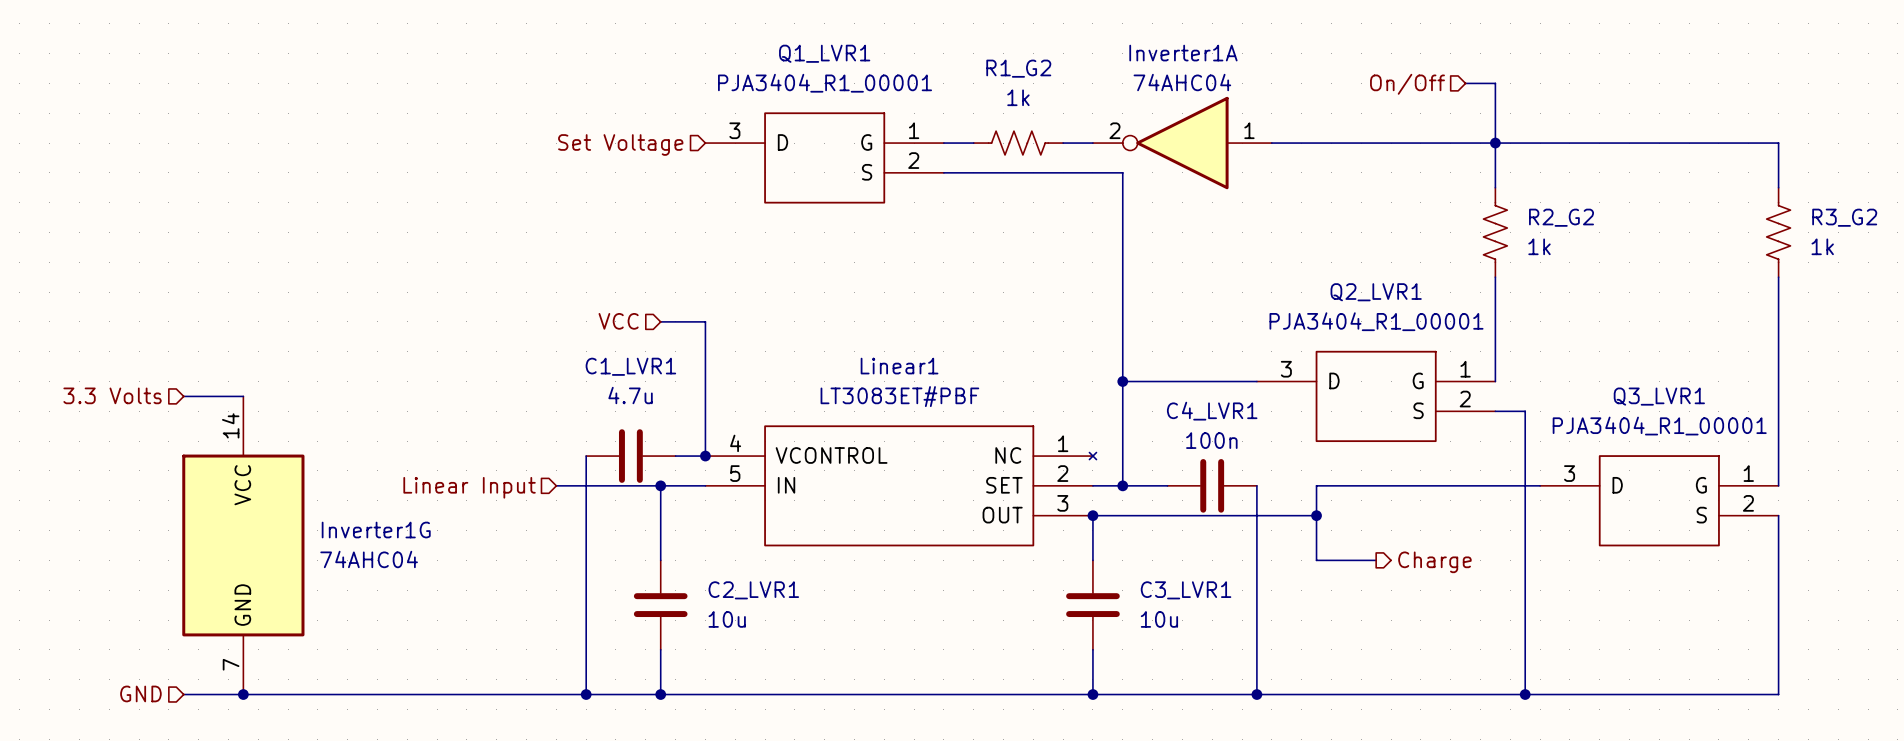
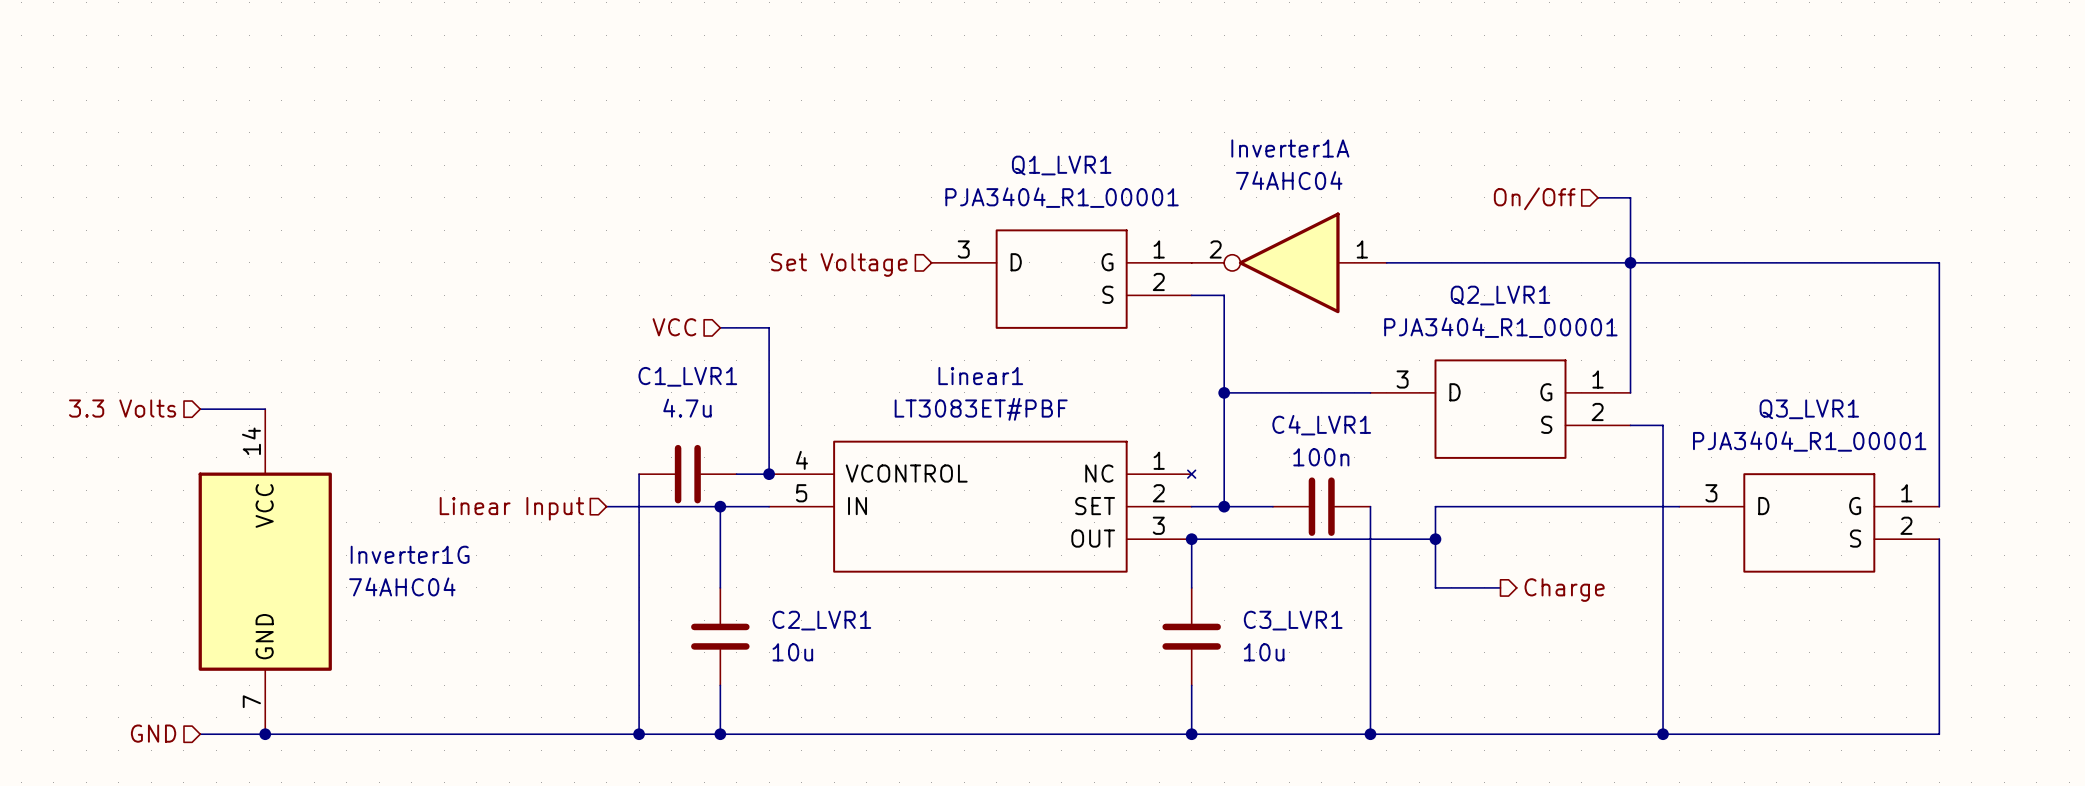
Inverter1A name position: Inverter1A (1183, 53) -> Inverter1A (1290, 148)
Inverter1A value position: 74AHC04 (1182, 82) -> 74AHC04 (1289, 180)
wire: (1465, 83) (1495, 83) (1495, 187) -> none
hierarchical label position: On/Off (1407, 84) -> On/Off (1534, 198)
wire: (943, 143) (973, 143) -> none
R1_G2: 1k (1018, 143) -> none
wire: (1063, 143) (1092, 143) -> none
Inverter1A position: (1182, 143) -> (1289, 262)
wire: (1271, 143) (1778, 143) (1778, 187) -> none
junction: (1495, 143) -> none
hierarchical label position: Set Voltage (620, 144) -> Set Voltage (839, 264)
Q1_LVR1 position: (824, 157) -> (1061, 279)
wire: (943, 172) (1122, 172) (1122, 292) -> (1191, 295) (1224, 295)
wire: none -> (1598, 197) (1630, 197) (1630, 279)
R2_G2: 1k (1495, 232) -> none
R3_G2: 1k (1778, 232) -> none
wire: none -> (1386, 262) (1939, 262) (1939, 279)
junction: none -> (1630, 262)

